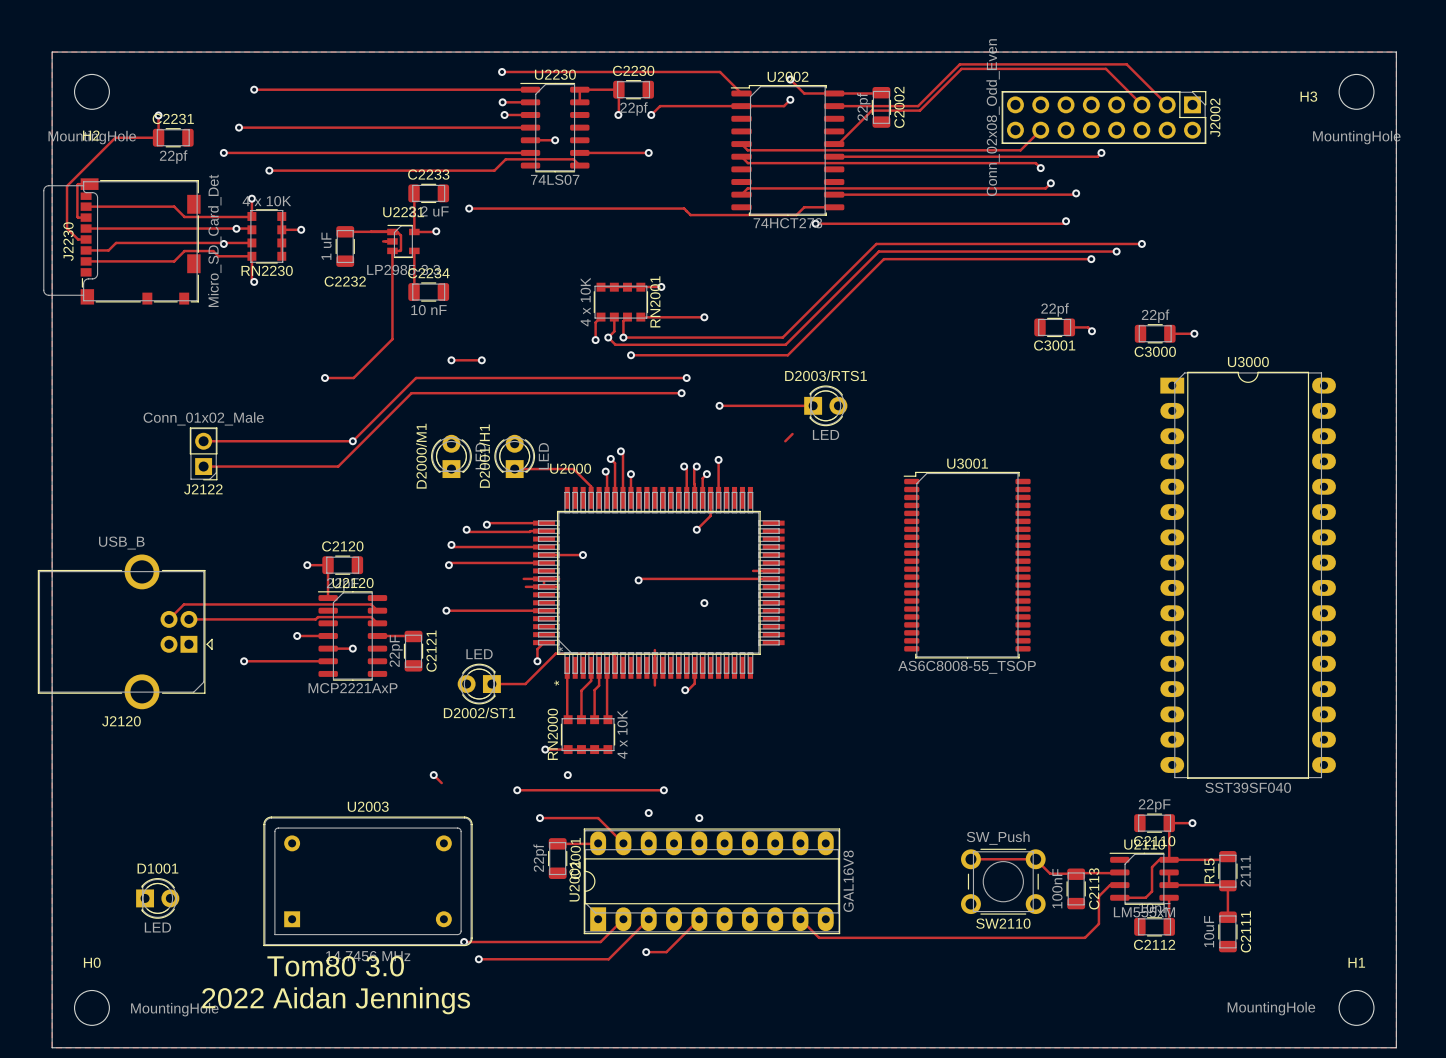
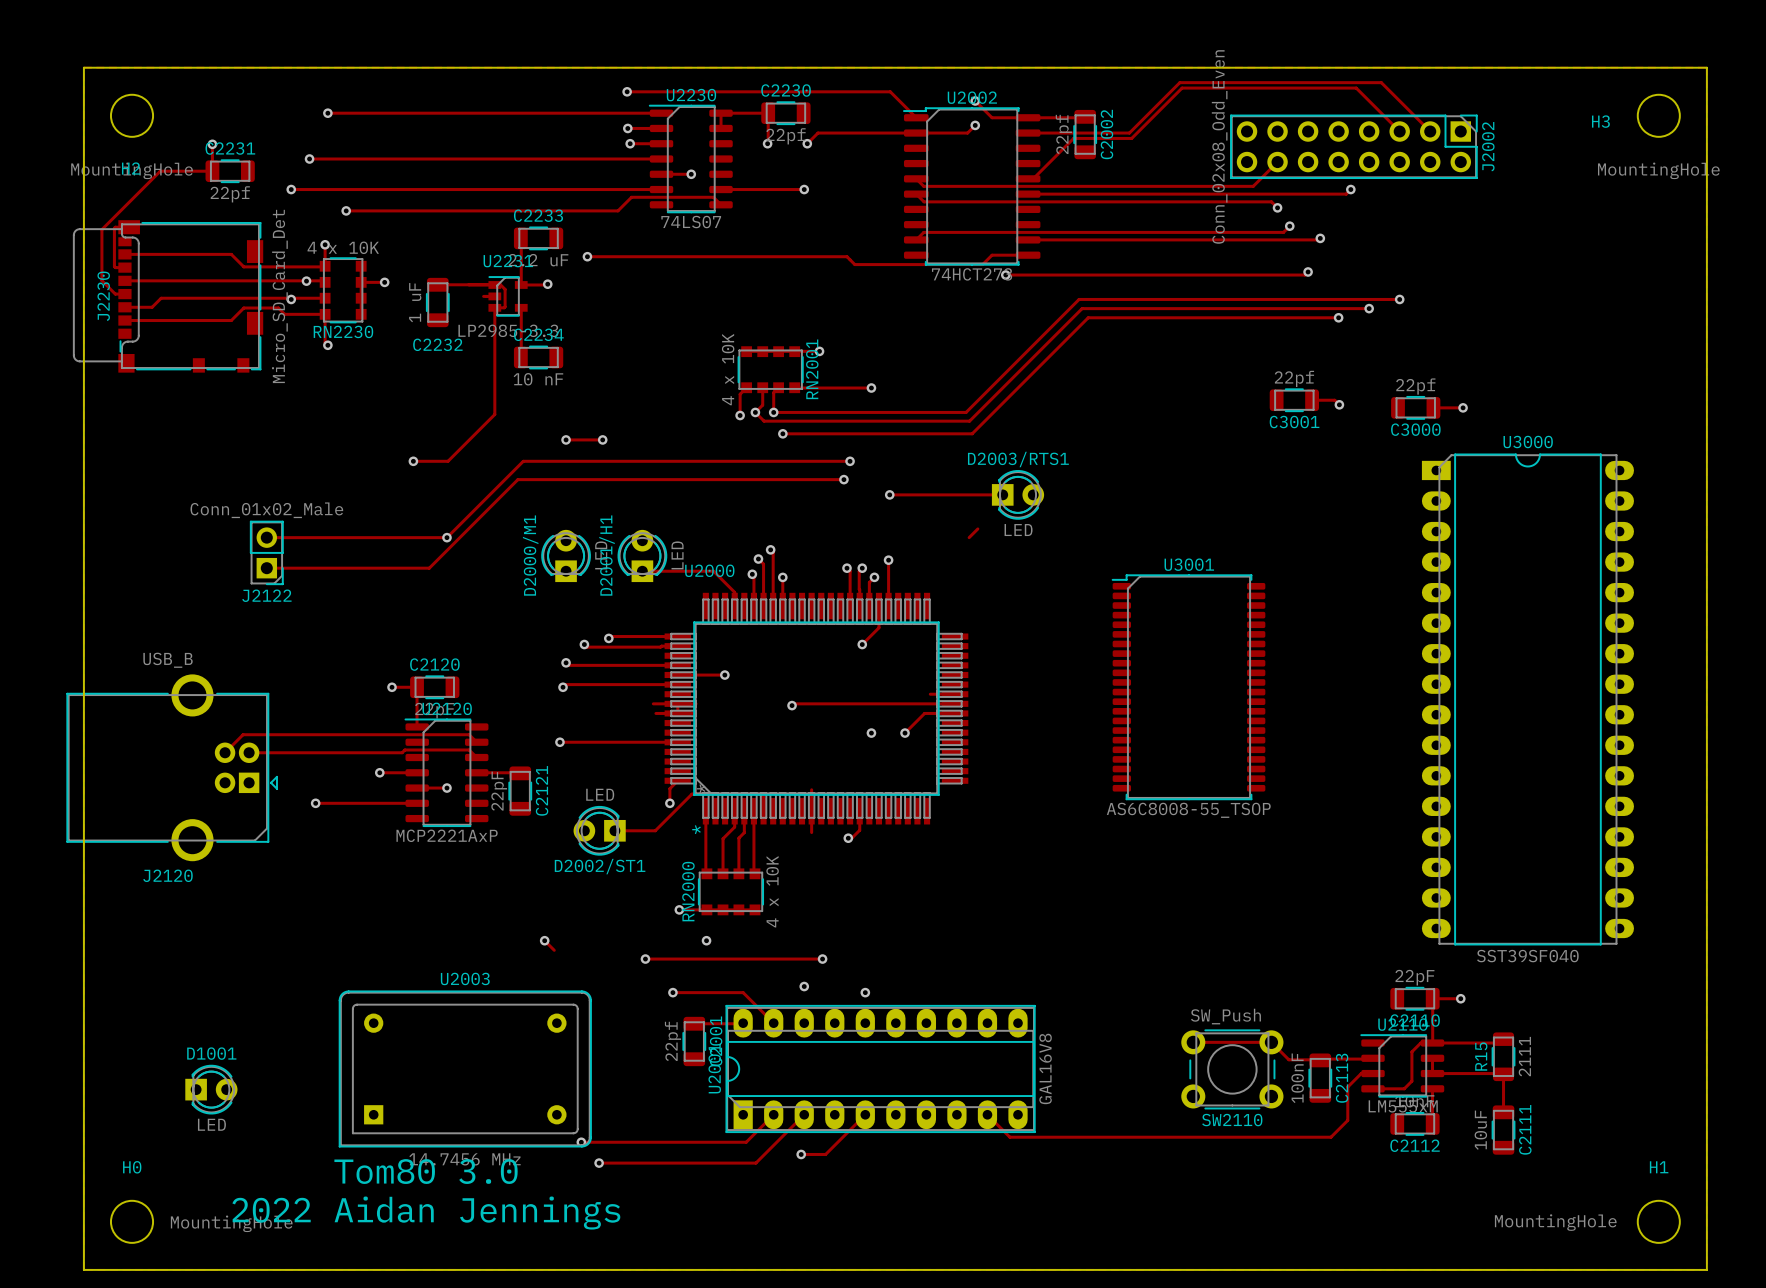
track: none -> (955, 713) (924, 713) (905, 733)
via: none -> (905, 733)

